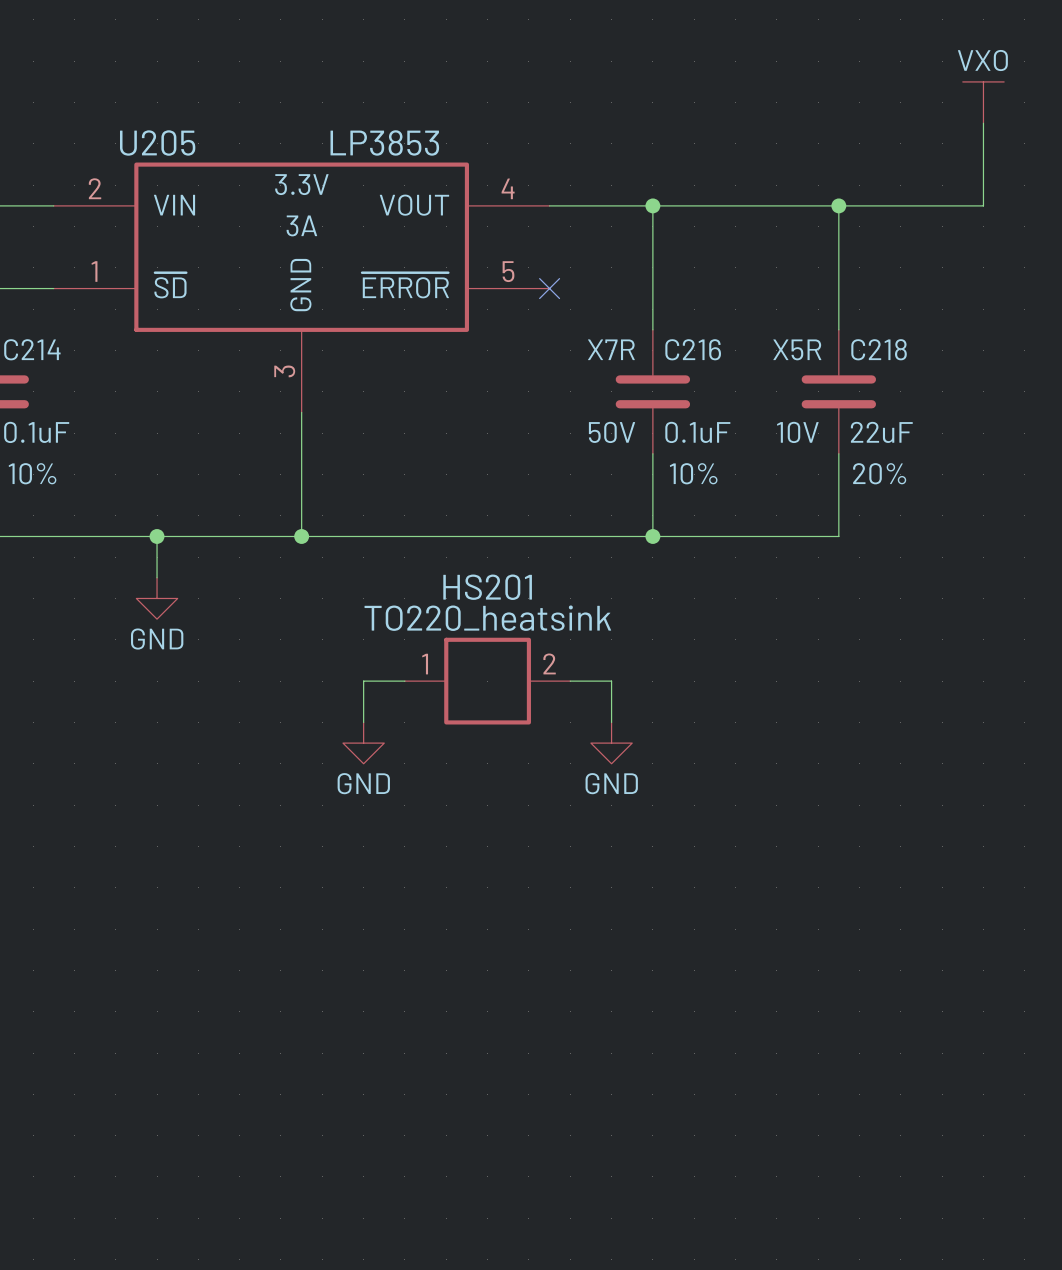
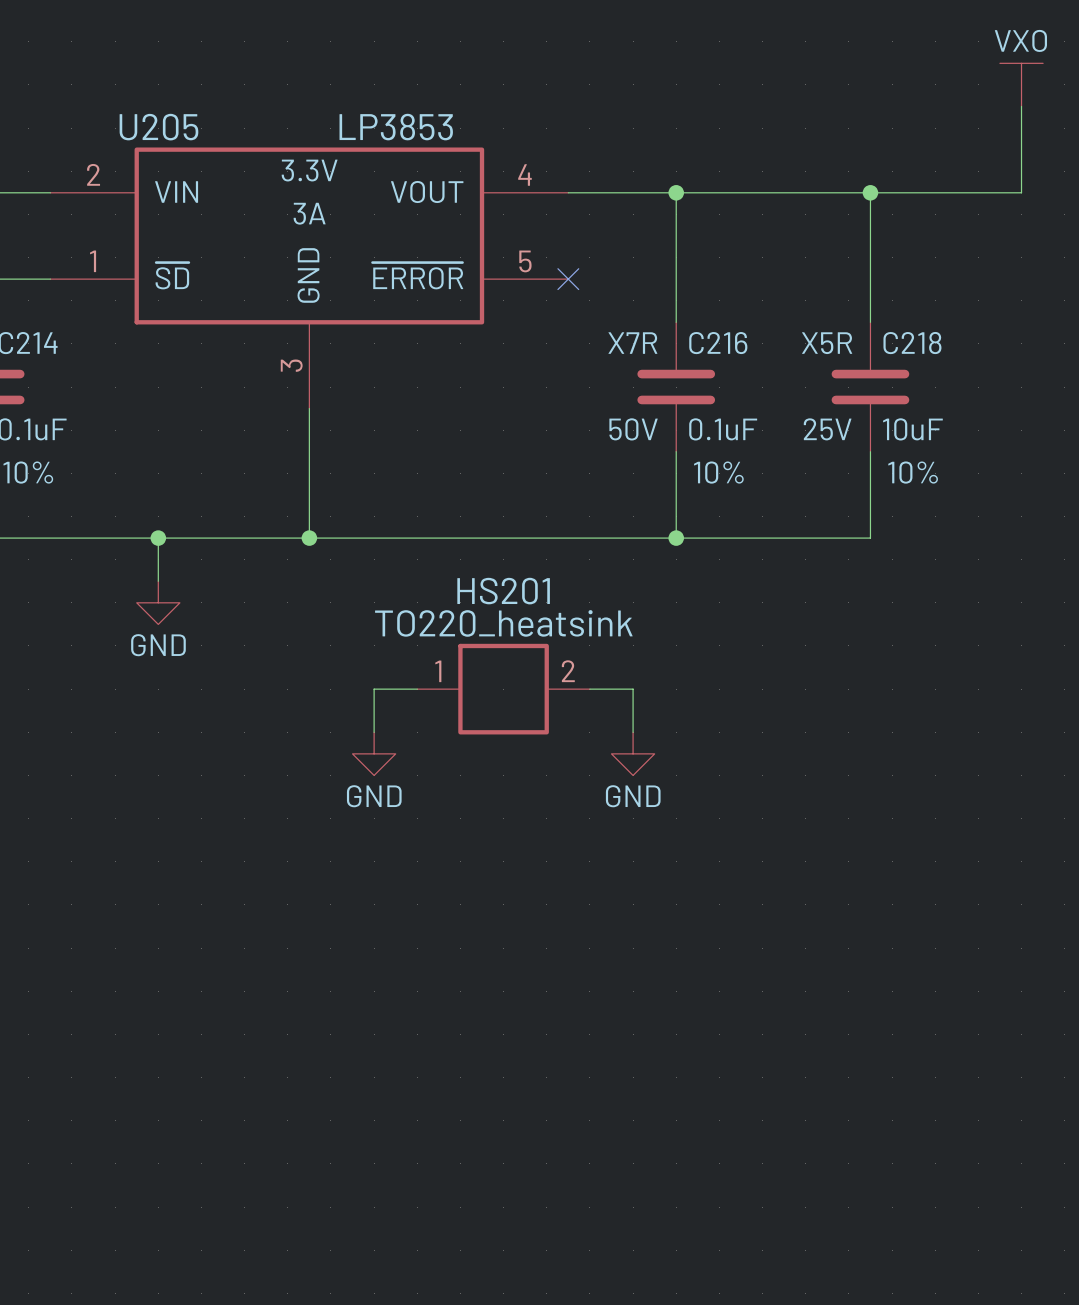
C218 text: 10V (797, 432) -> 25V (827, 429)
C218 value: 22uF (881, 432) -> 10uF (912, 429)
C218 text: 20% (879, 473) -> 10% (913, 472)

